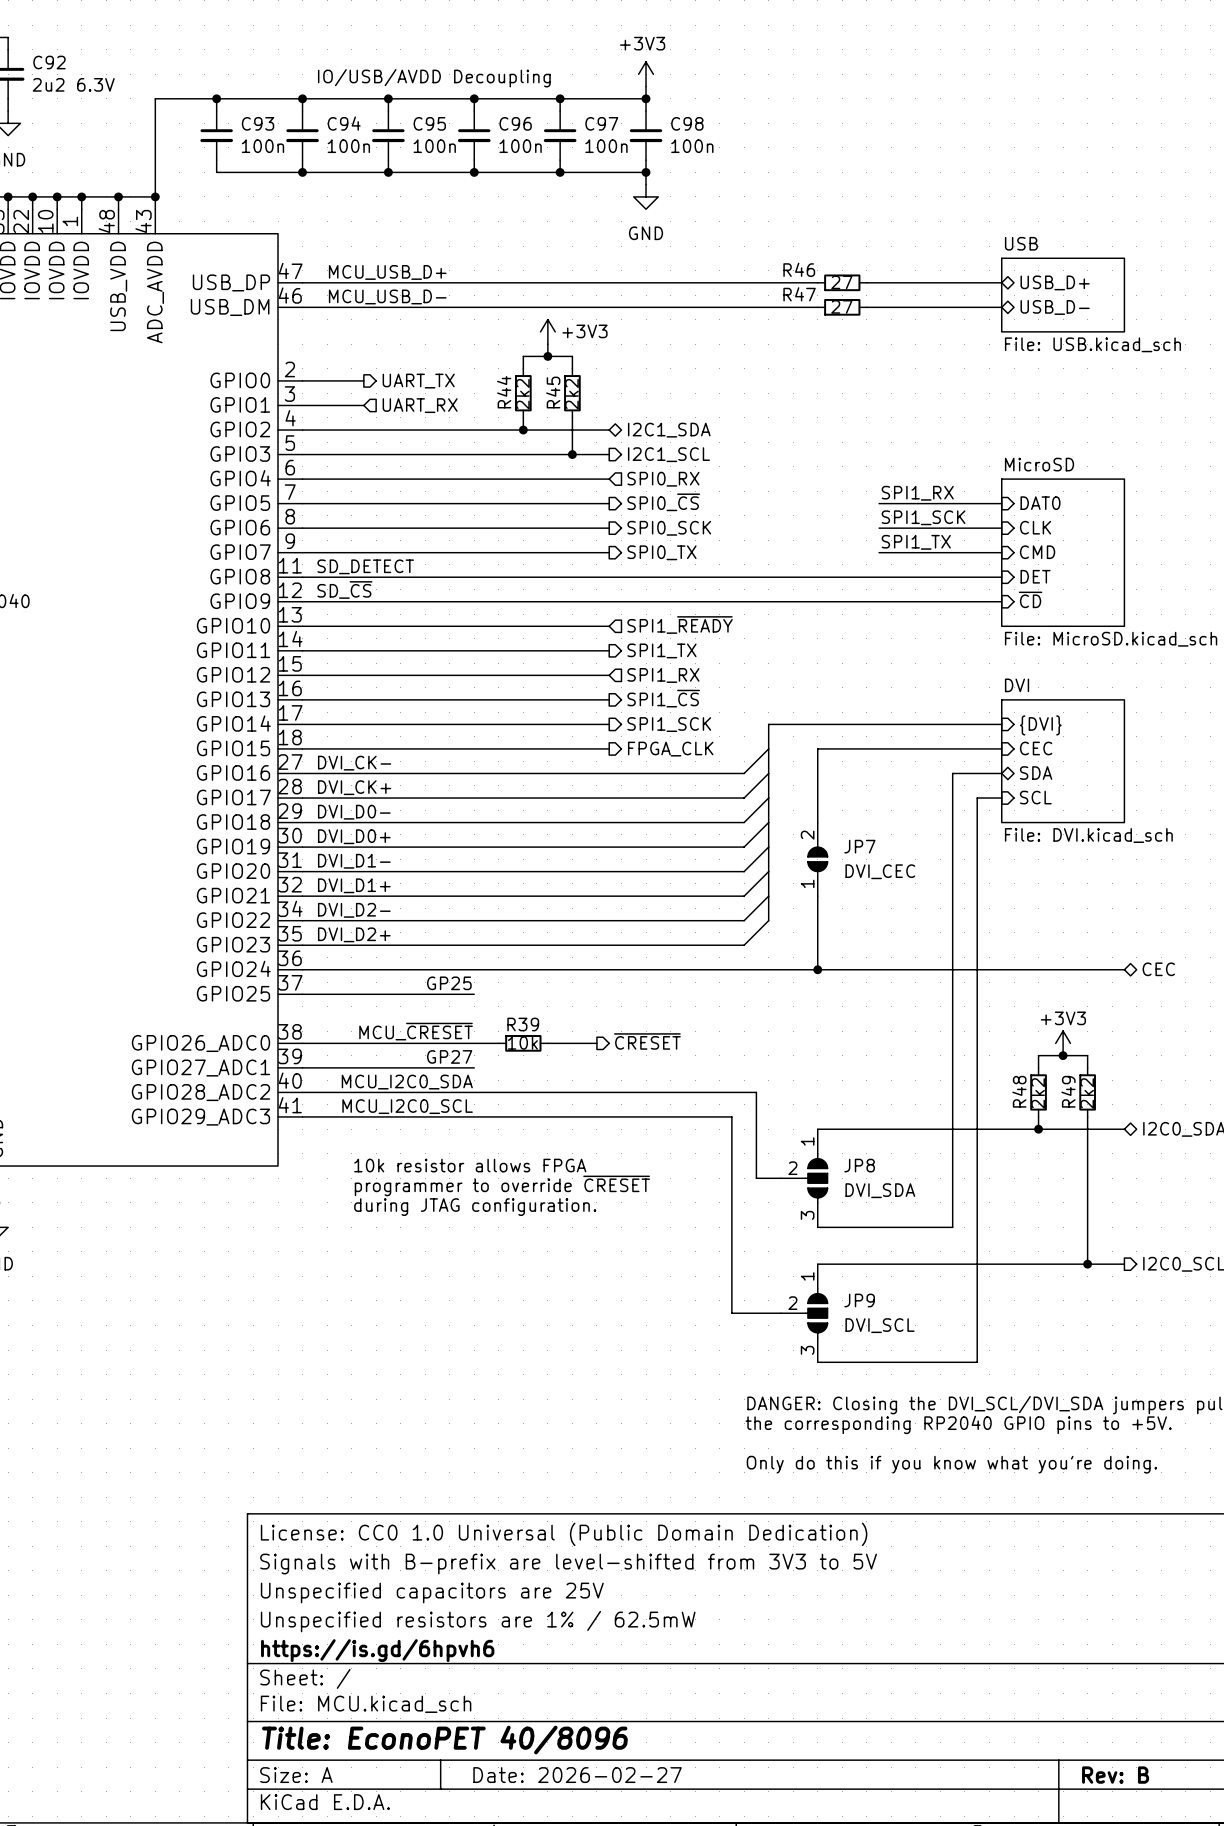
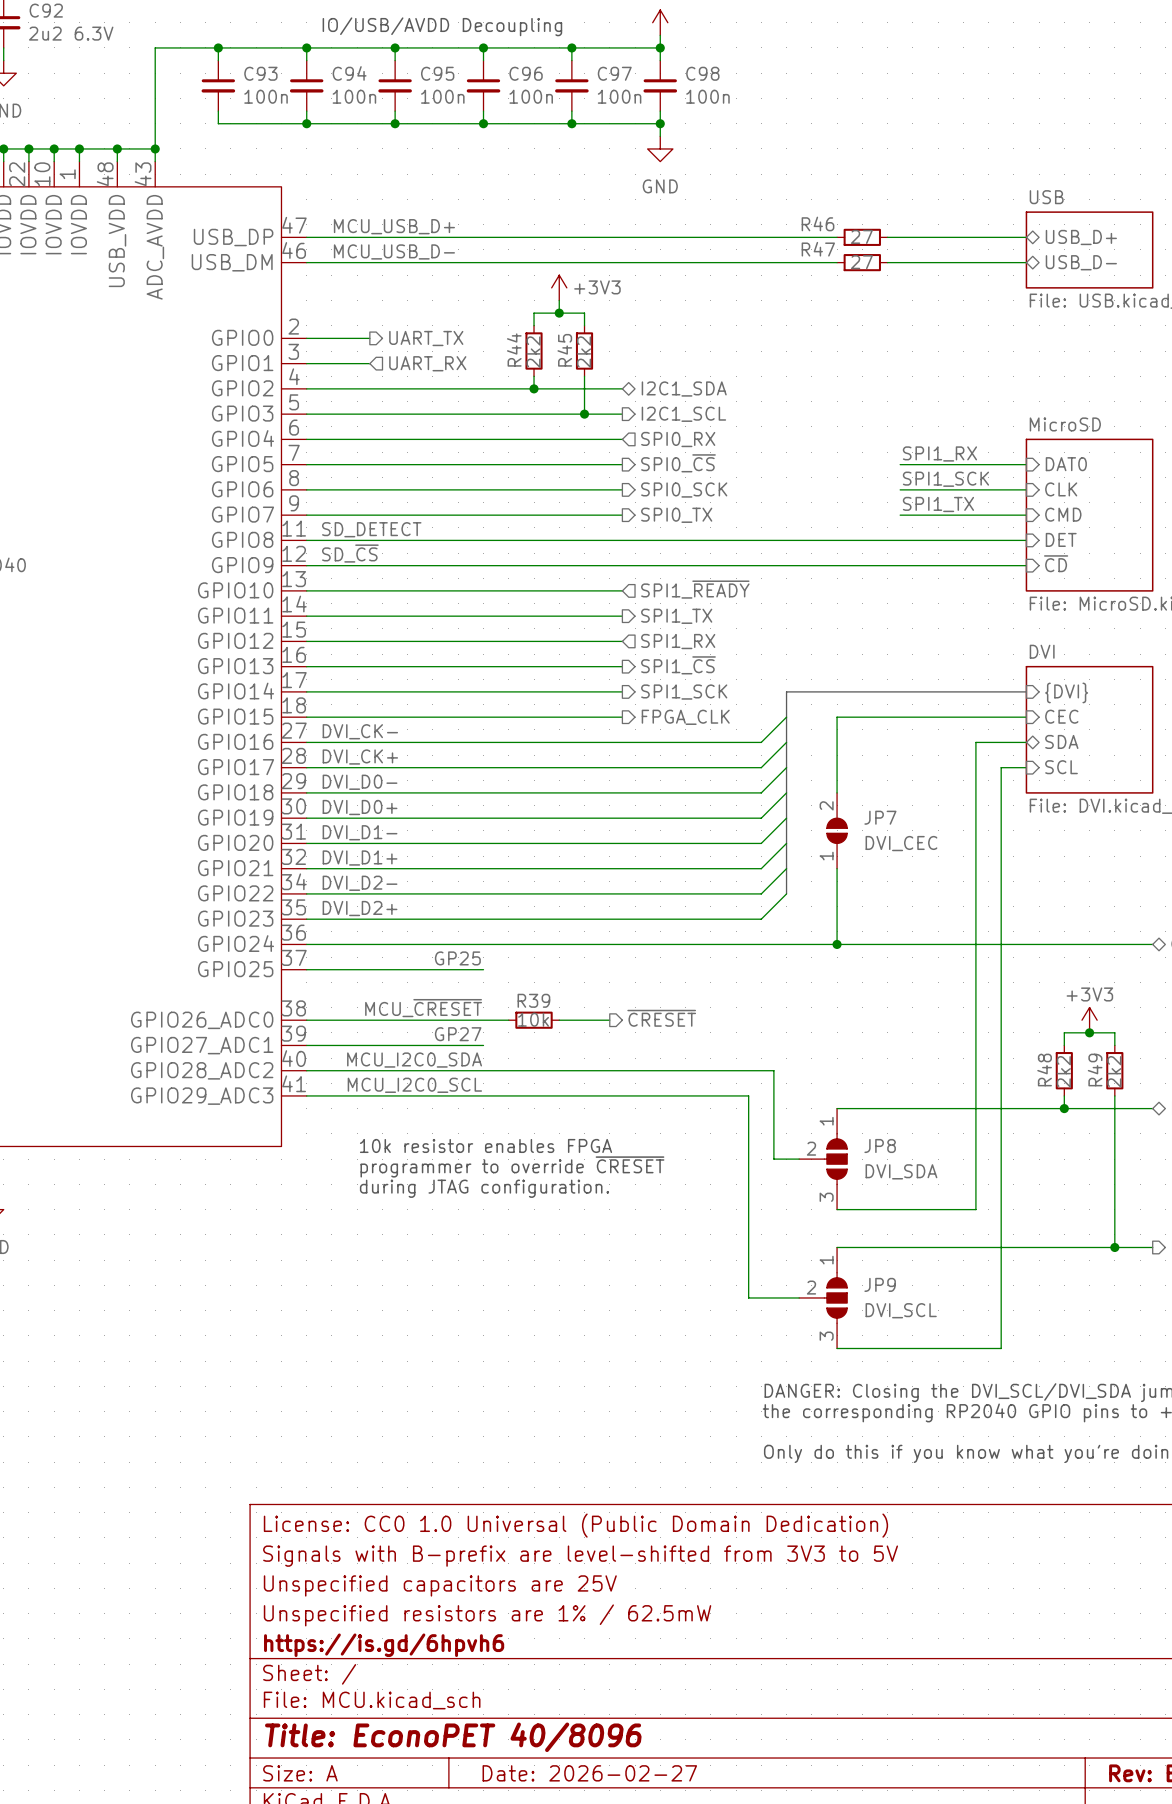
text: 10k resistor allows FPGA (470, 1165) -> 10k resistor enables FPGA (486, 1145)

